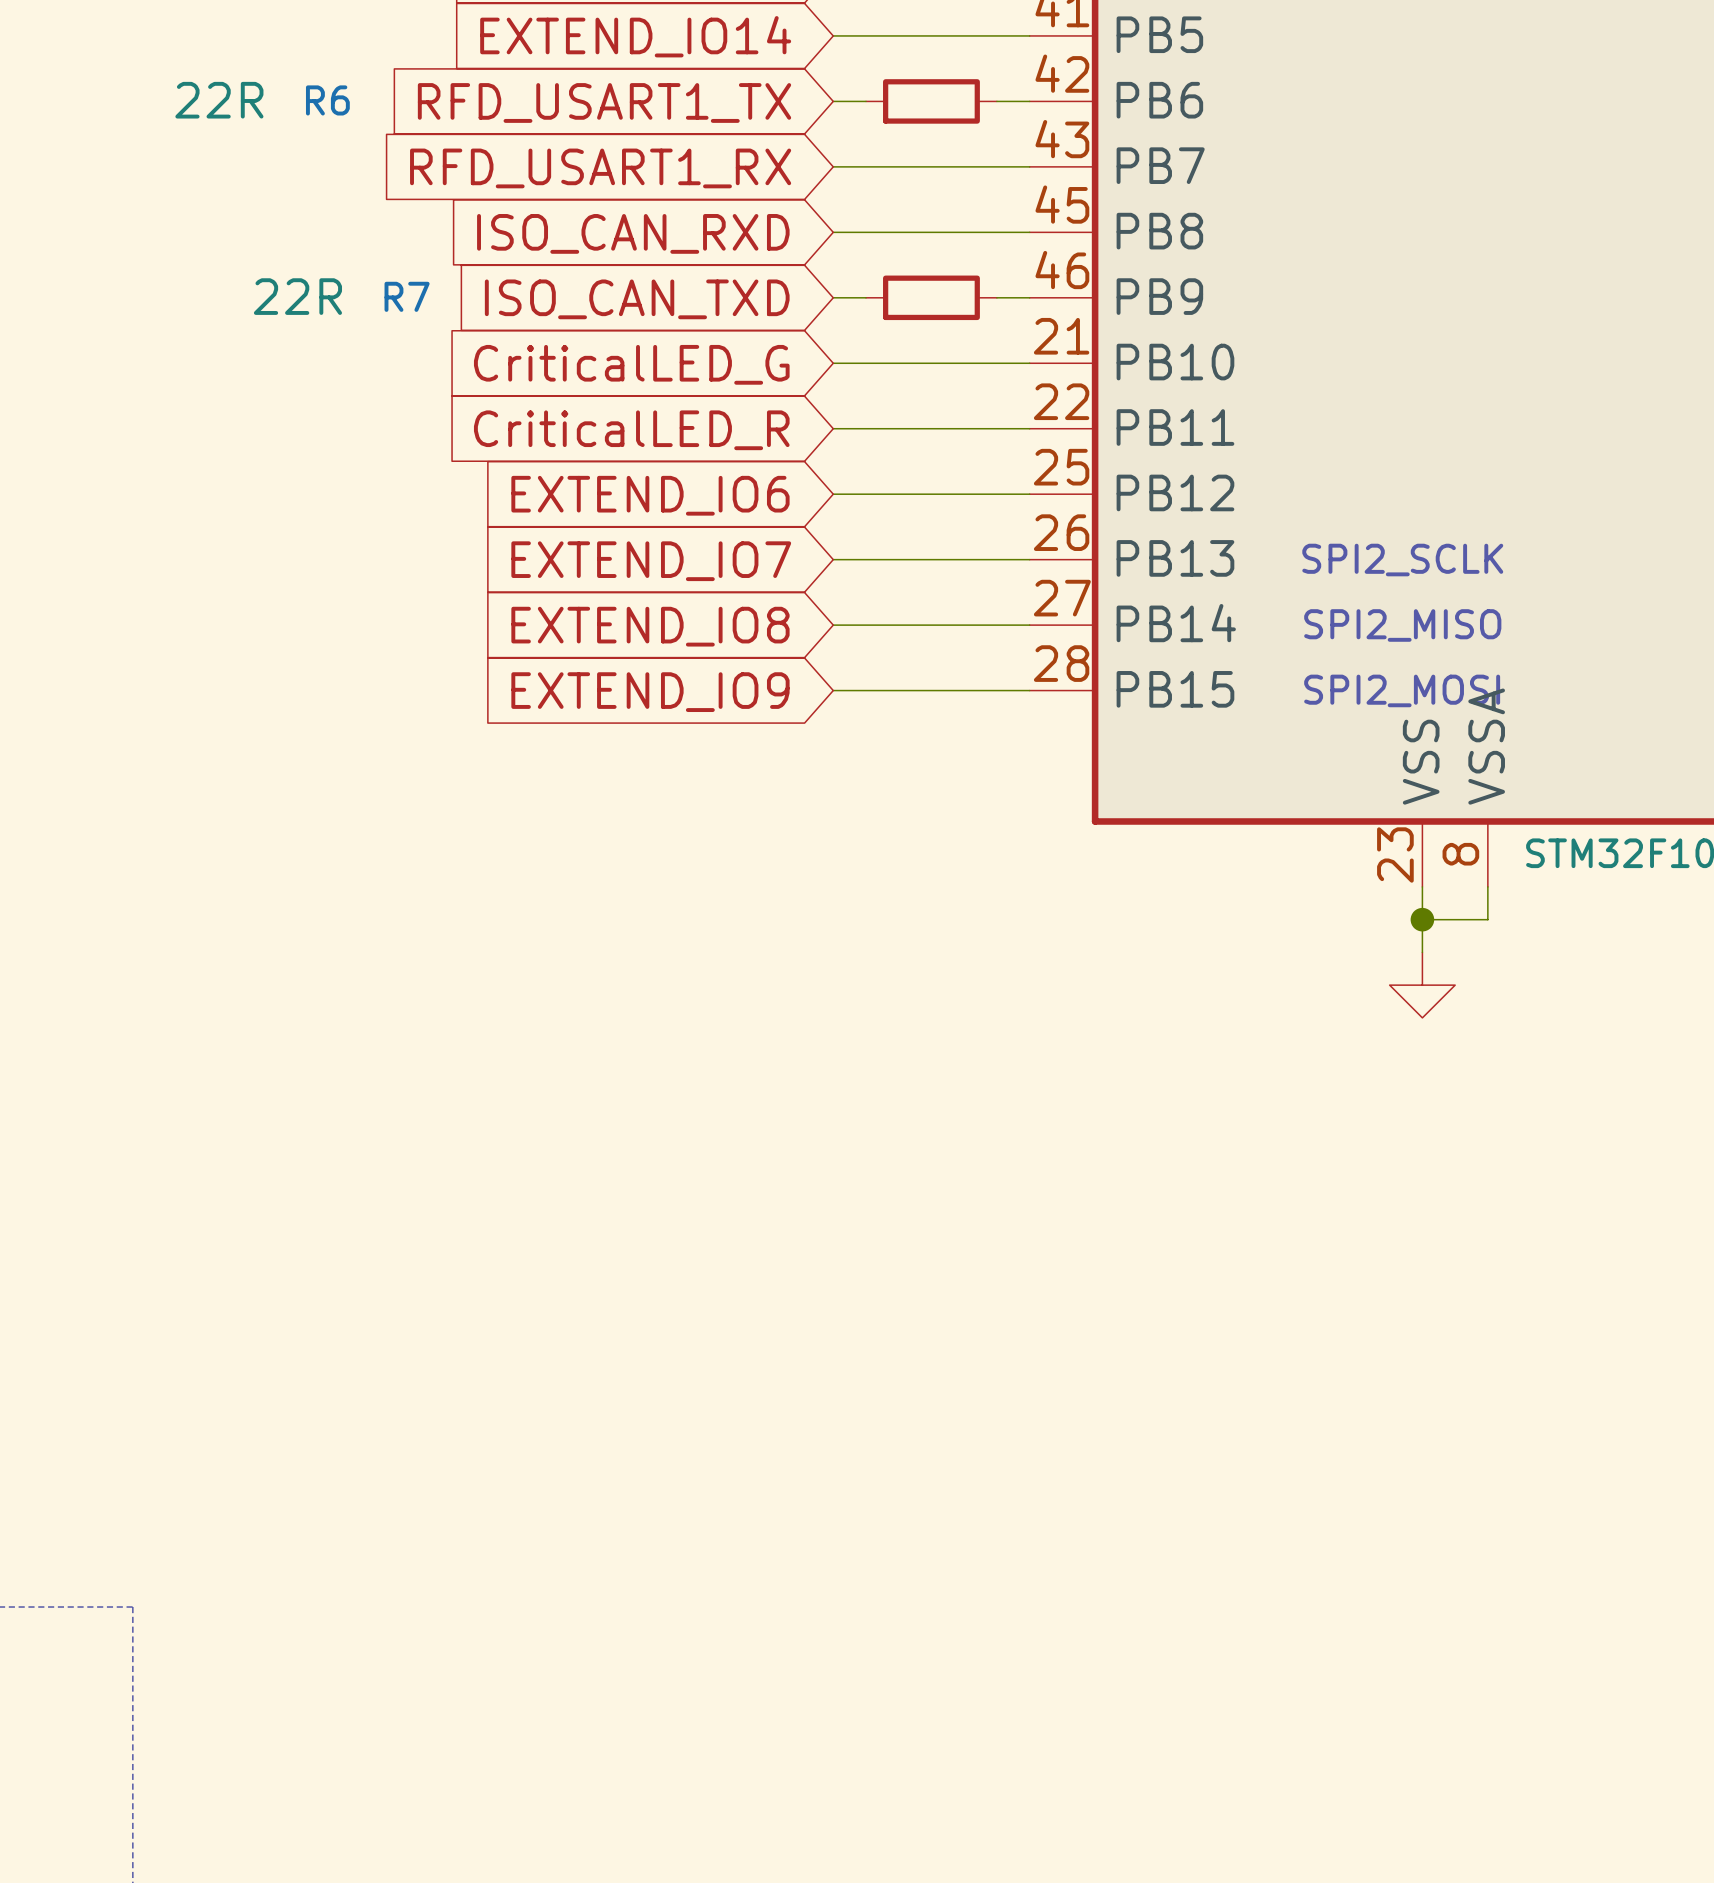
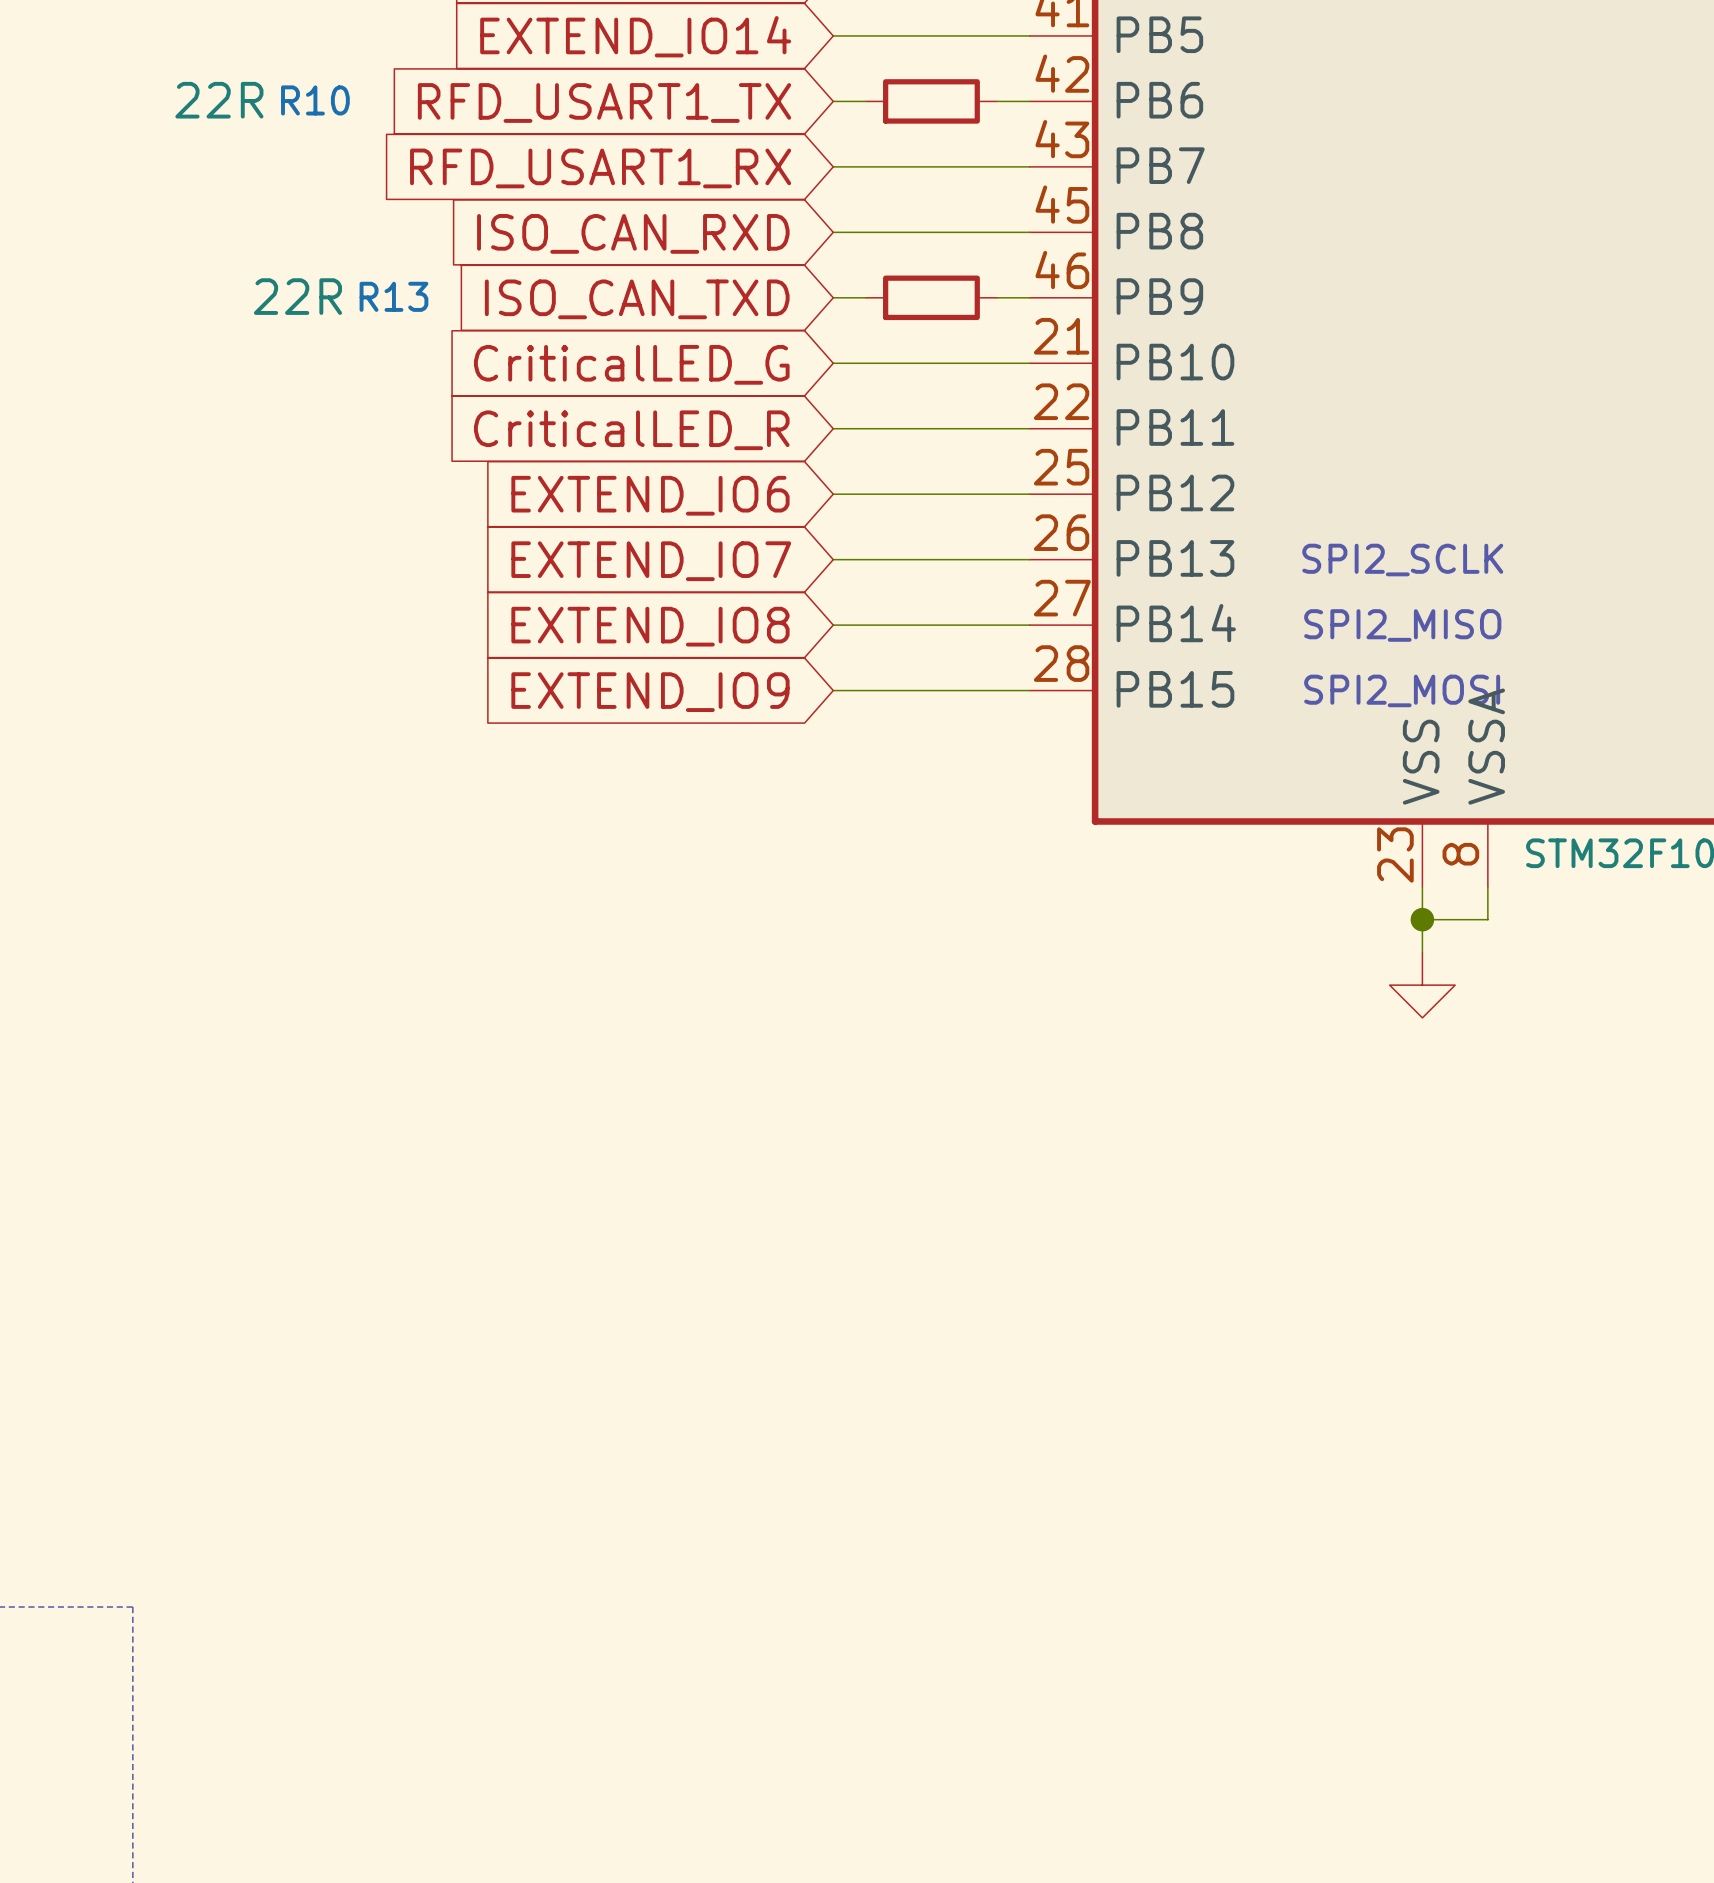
R6 name: R6 (327, 100) -> R10 (315, 100)
R7 name: R7 (407, 296) -> R13 (393, 296)

